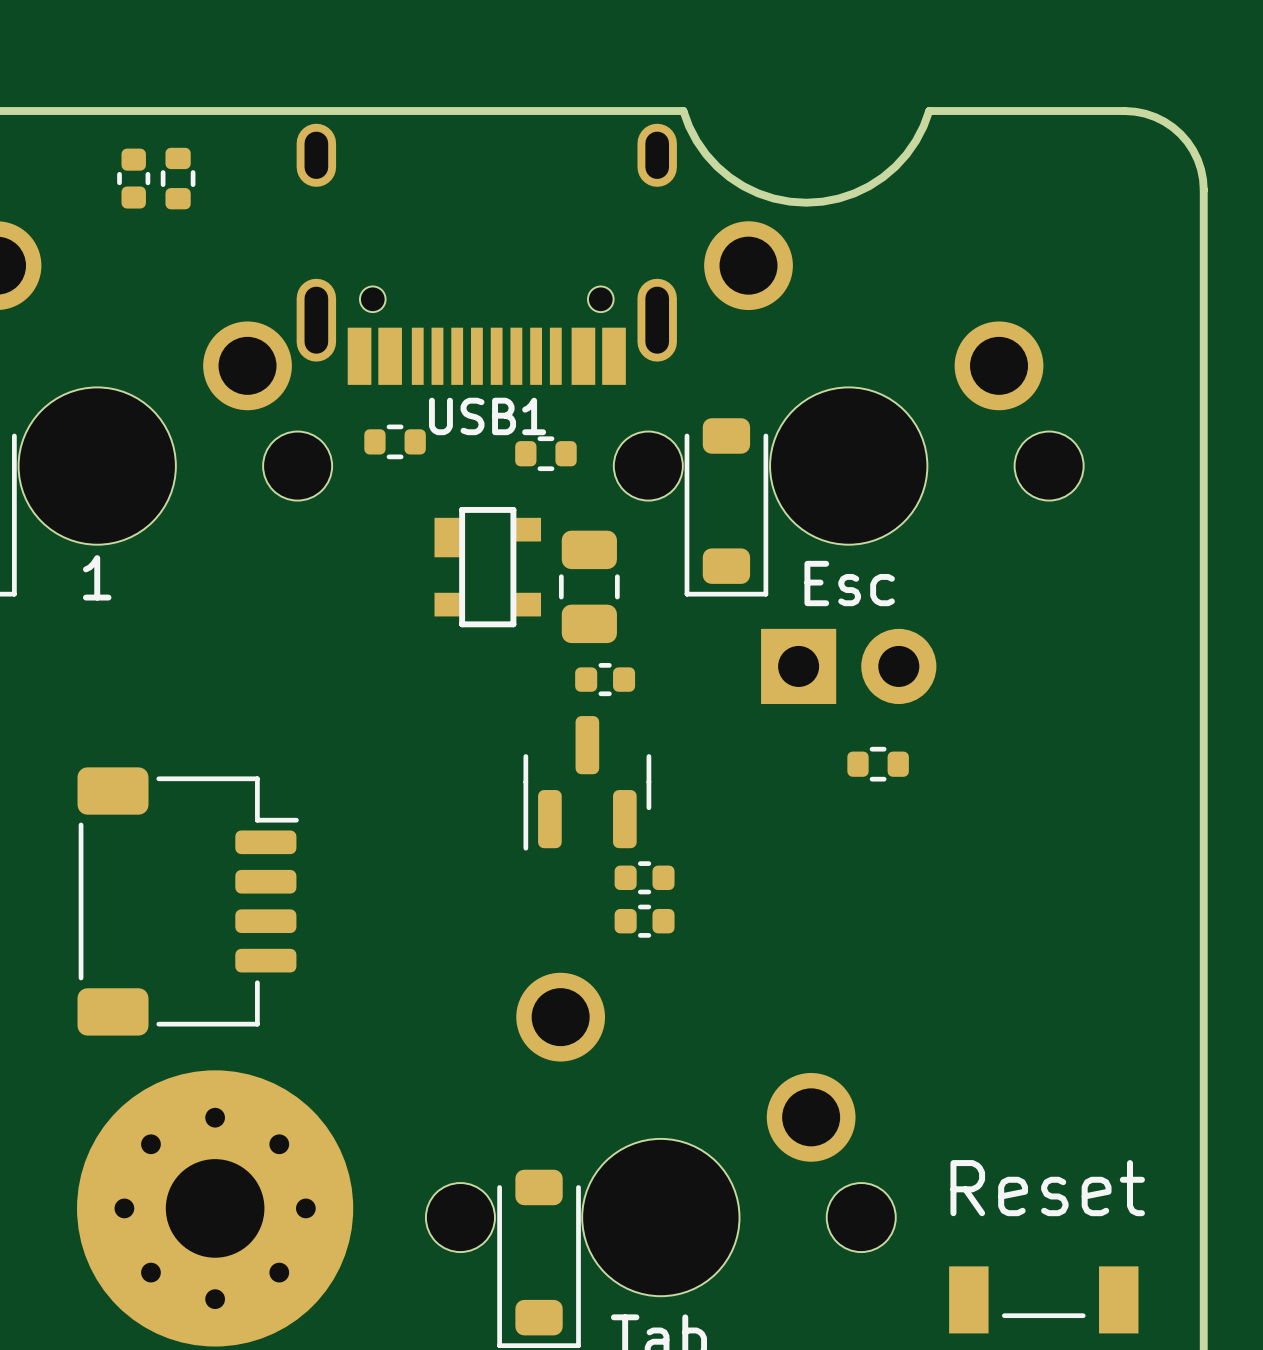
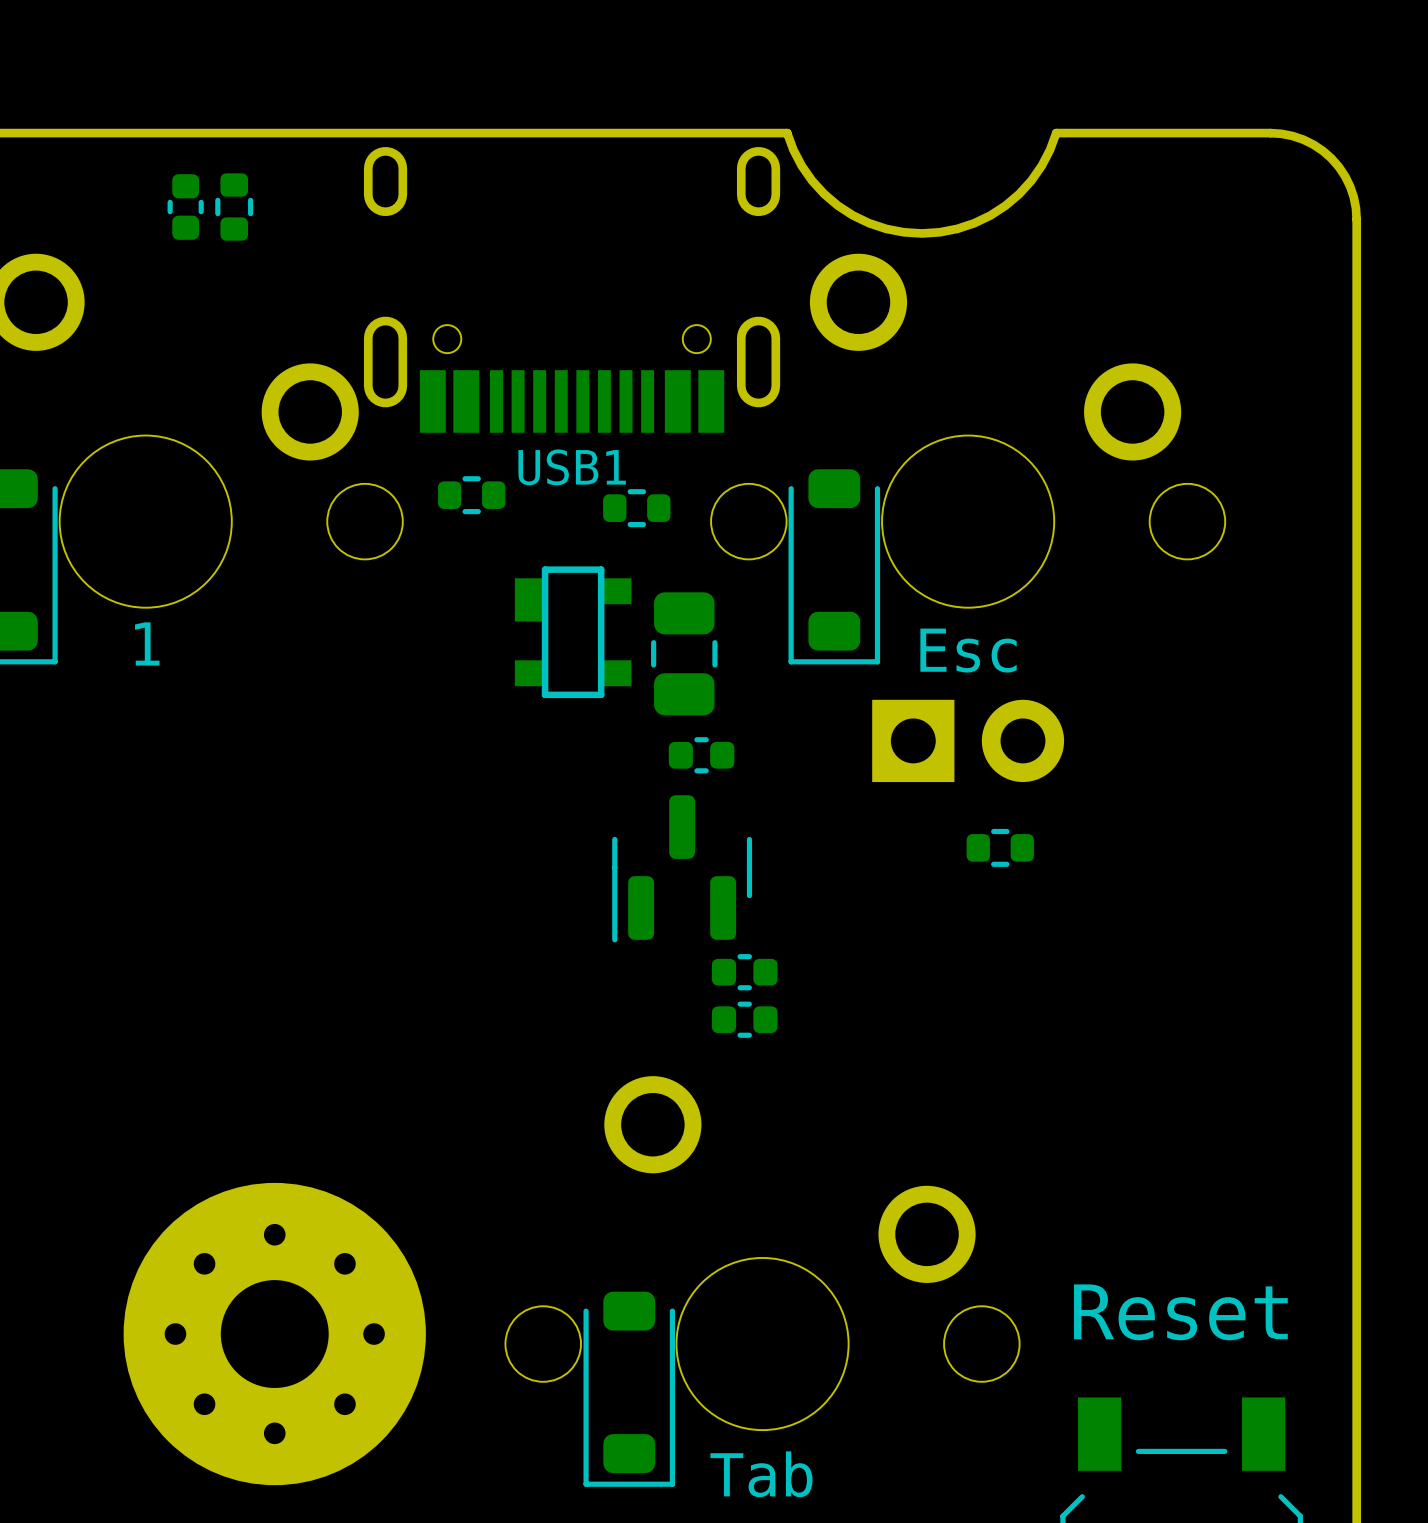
part: (188, 901) -> none

